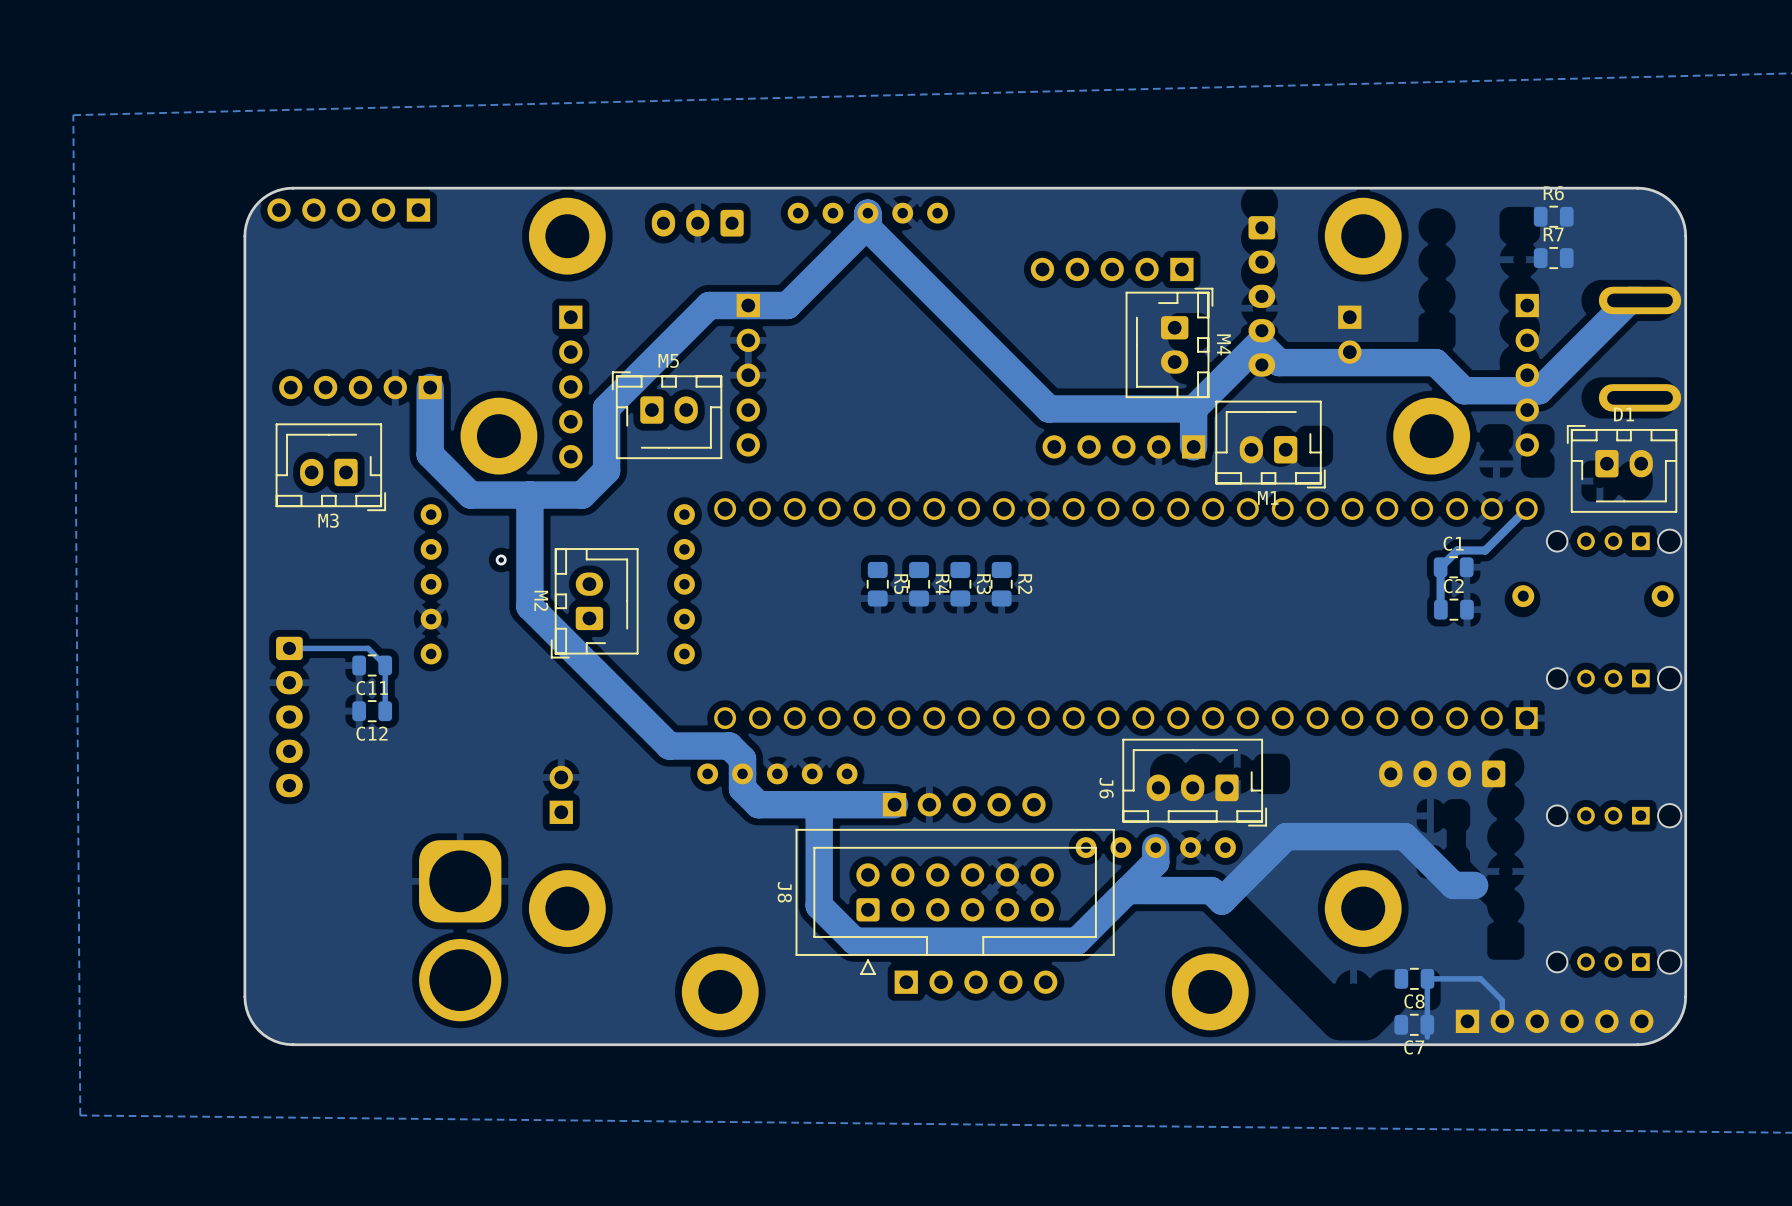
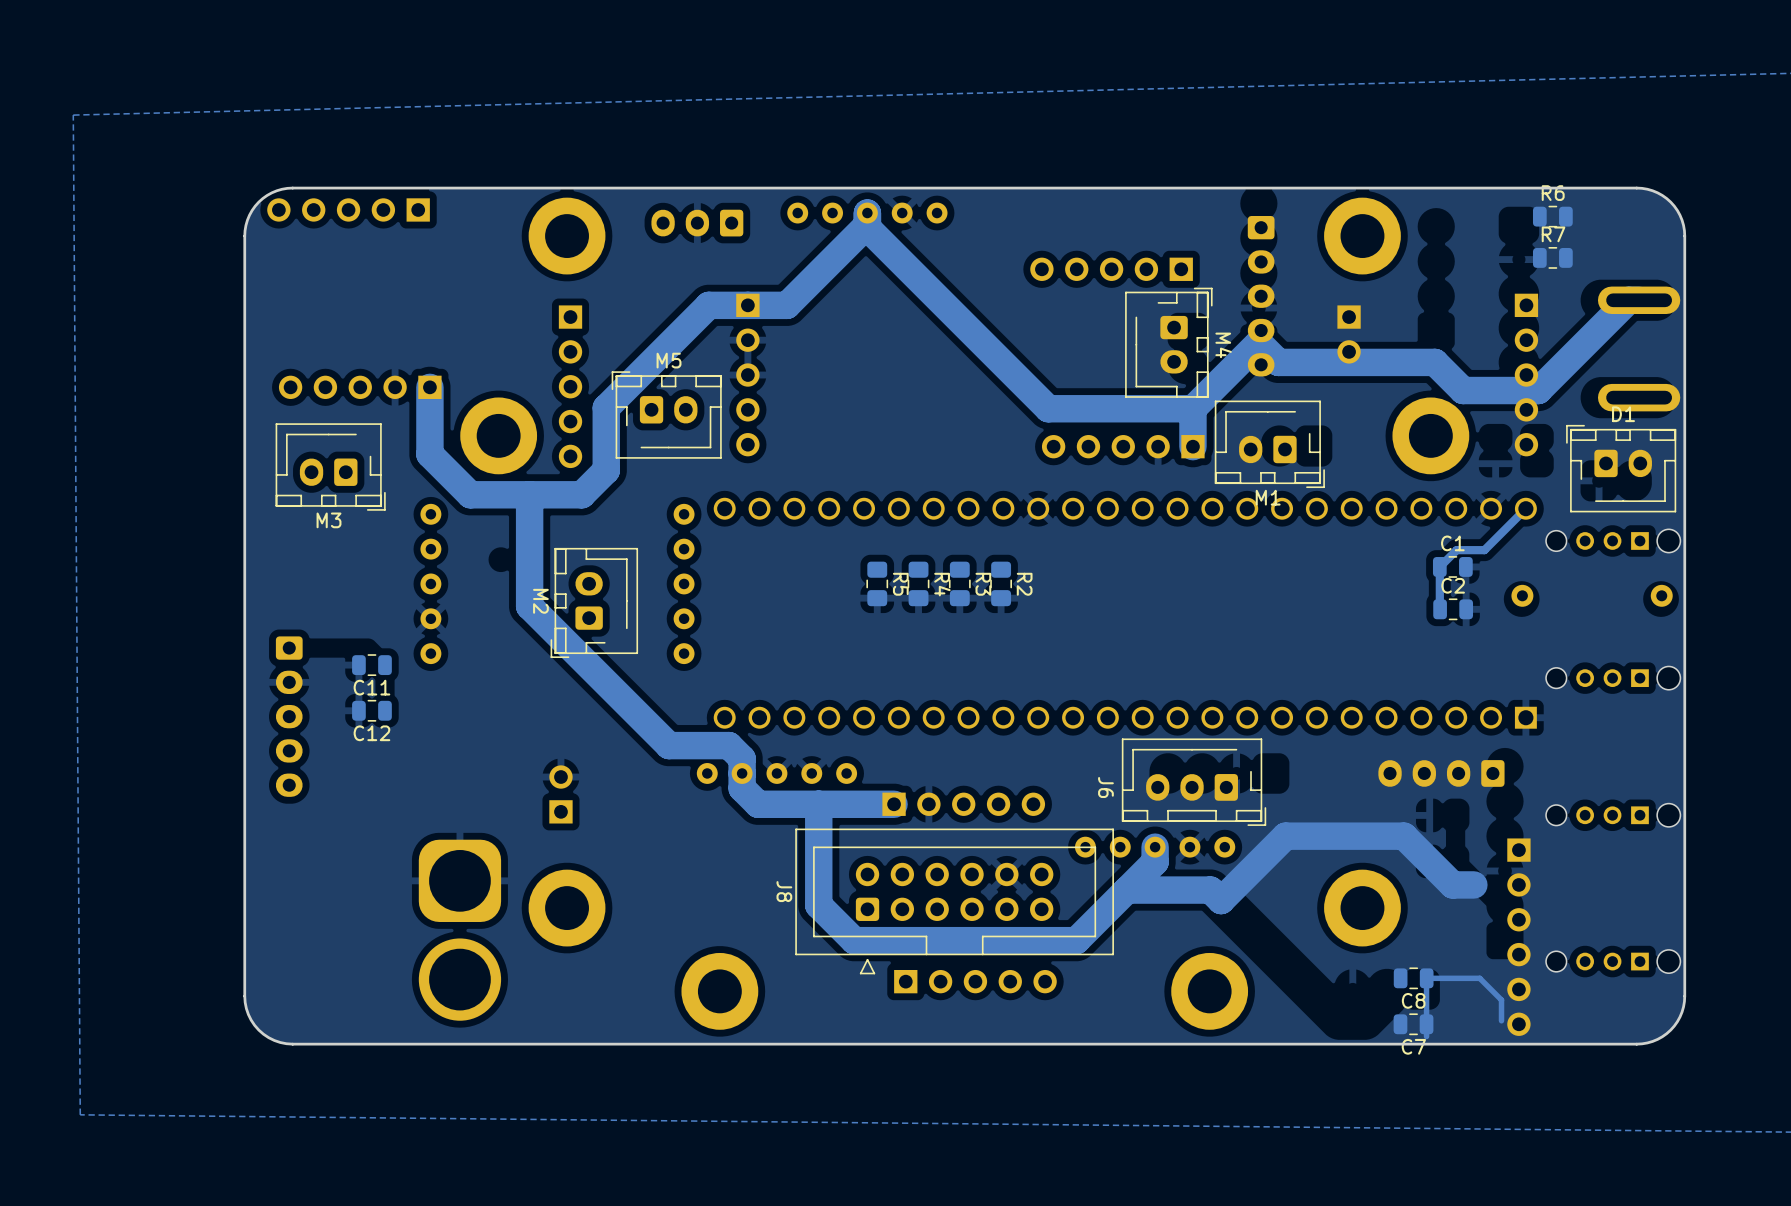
via: (501, 559) -> none
track: (289, 648) (368, 648) (385, 665) (385, 711) -> none
part rotation: 0° (1554, 1021) -> 90° clockwise (1518, 937)

